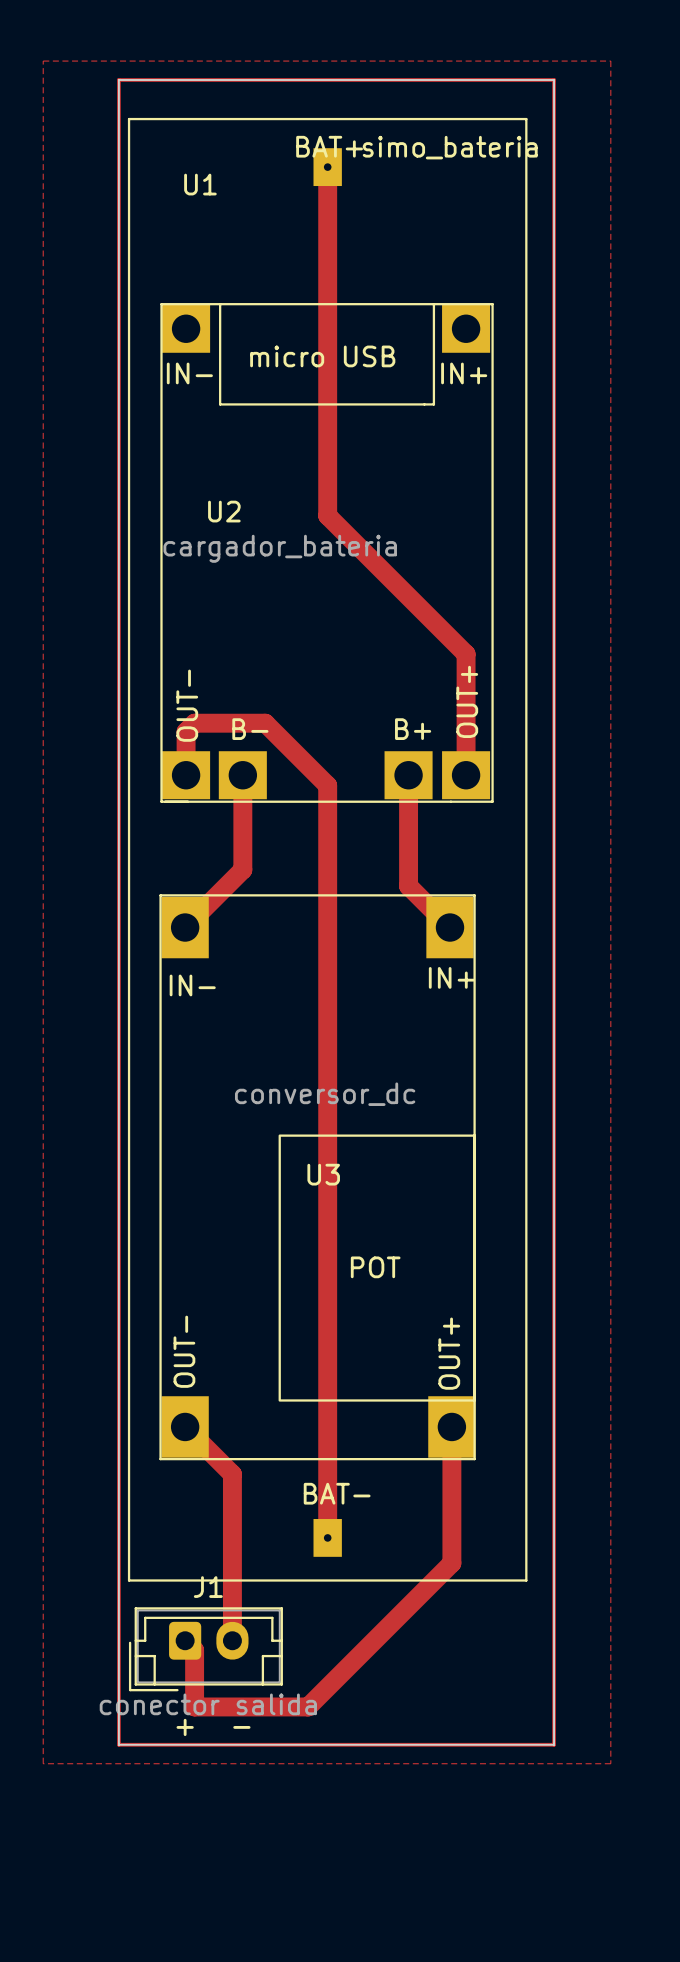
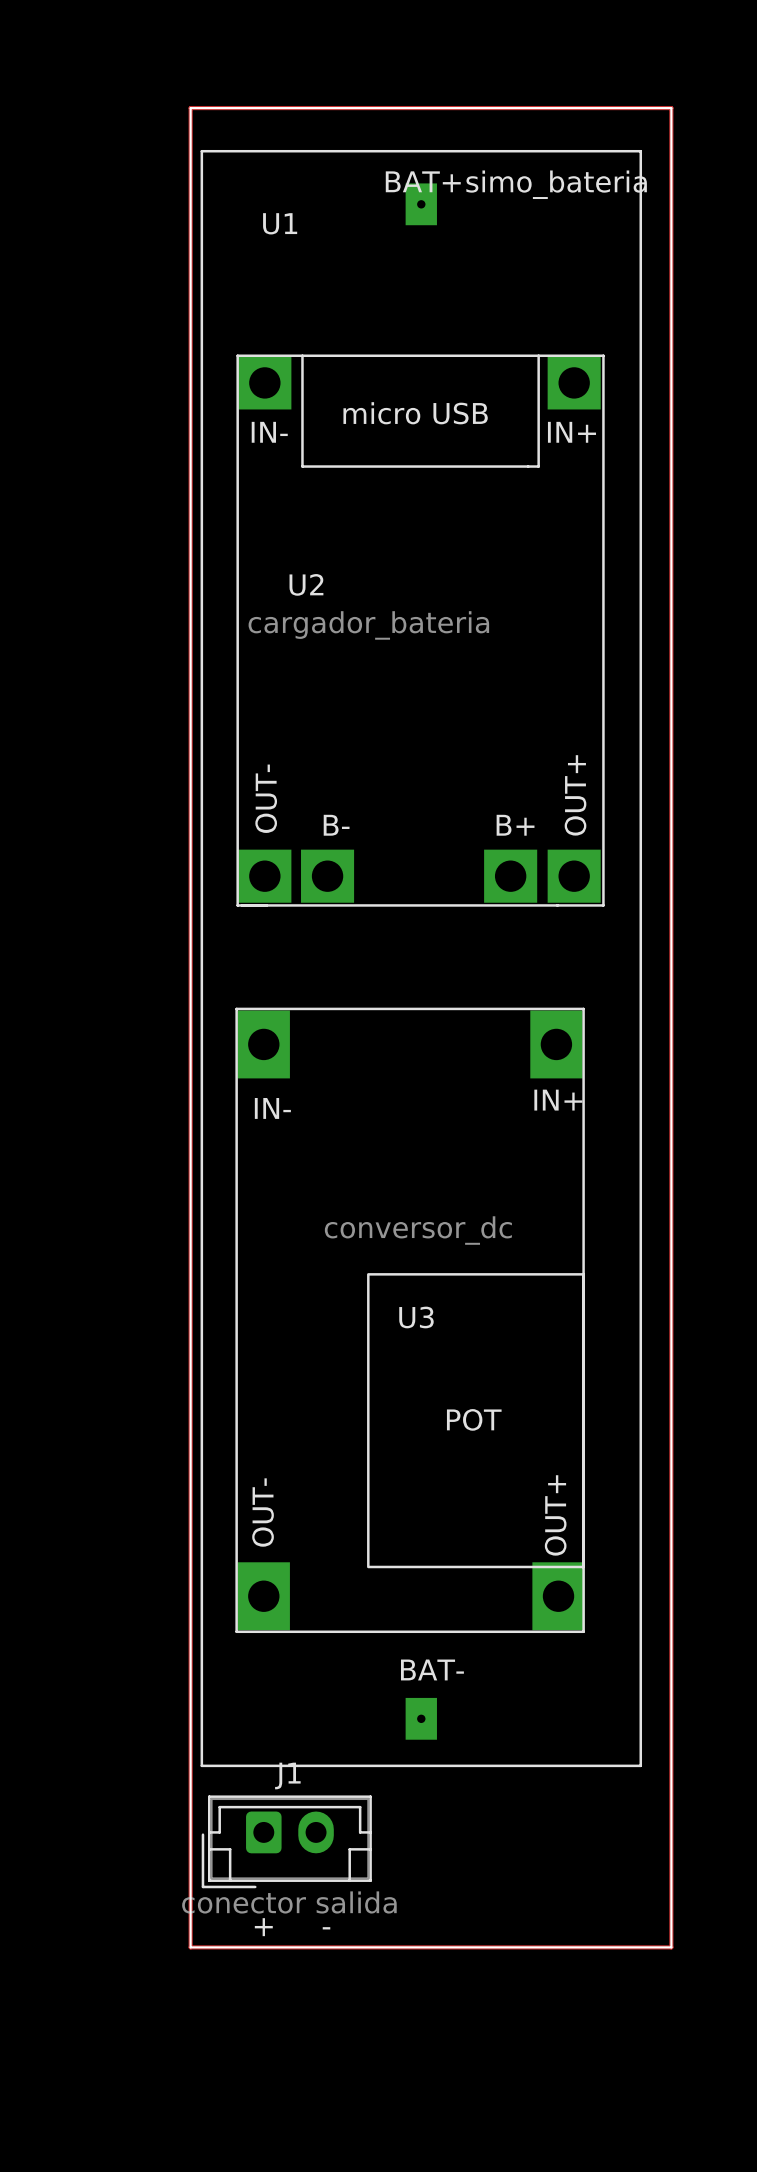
top zone outline: (43, 61) (43, 1763) (610, 1763) (610, 61) (43, 61) -> none
top track: (327, 167) (327, 515) (466, 654) (466, 775) -> none
top track: (186, 775) (186, 731) (194, 723) (265, 723) (327, 785) (327, 1537) -> none
top track: (242, 775) (242, 869) (185, 927) -> none
top track: (408, 775) (408, 886) (449, 927) -> none
top track: (185, 1426) (232, 1474) (232, 1640) -> none
top track: (451, 1426) (451, 1563) (308, 1706) (194, 1706) (194, 1650) (185, 1640) -> none

